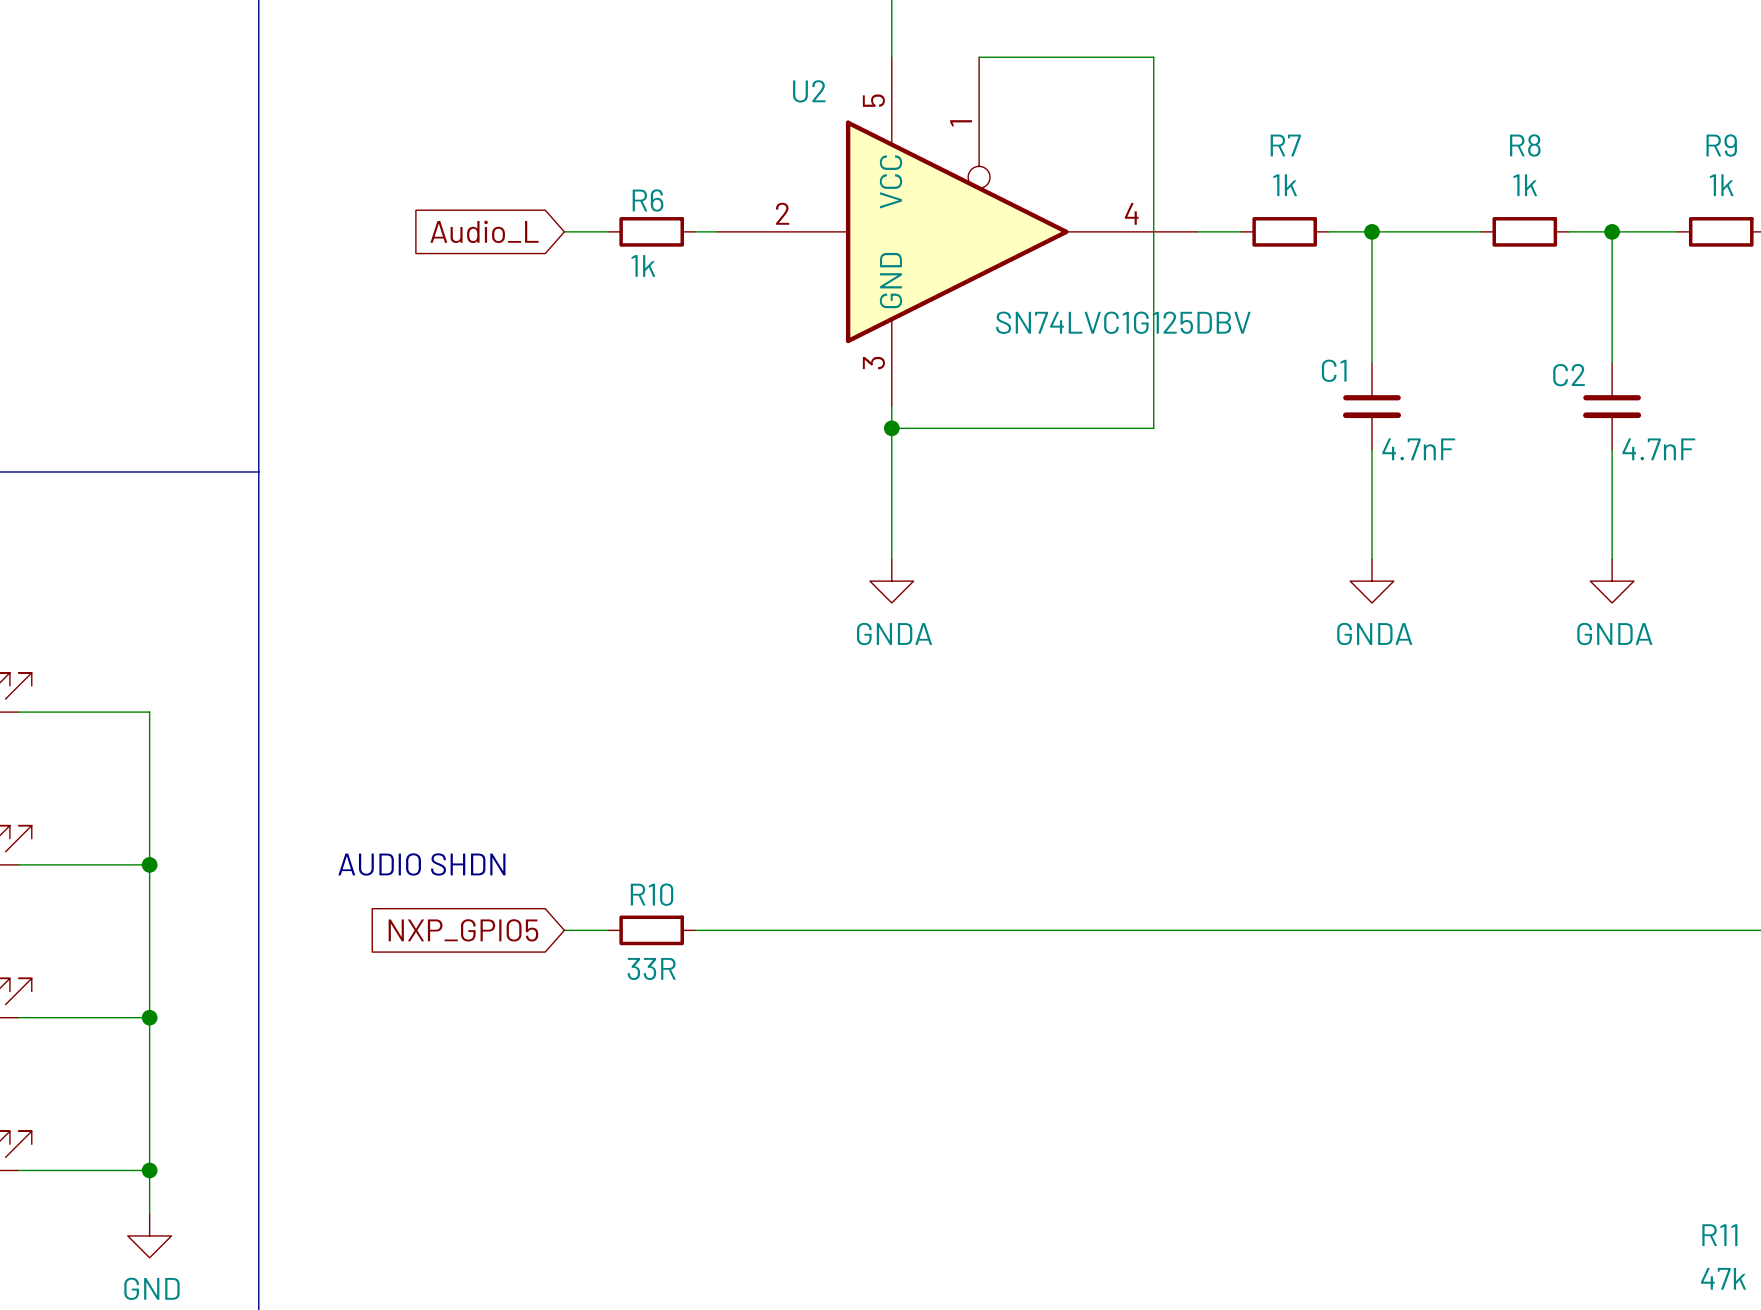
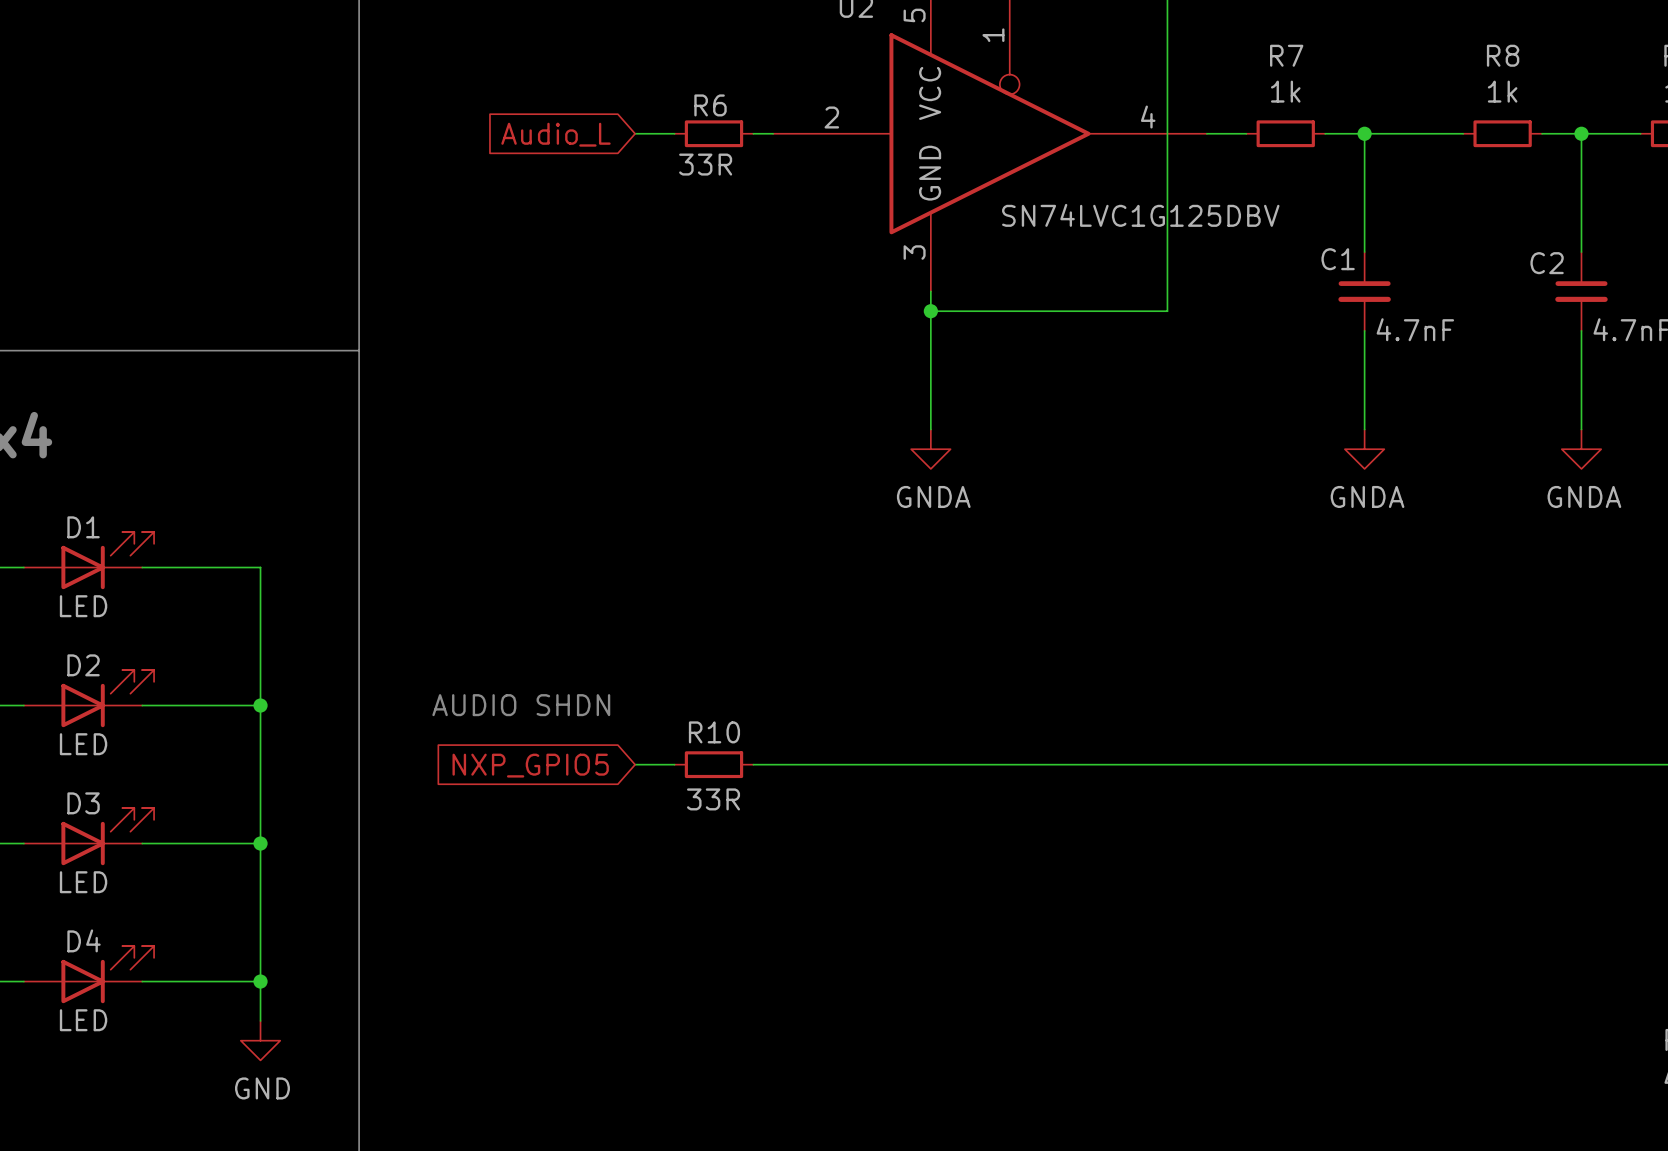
R6 value: 1k (643, 265) -> 33R (705, 164)

